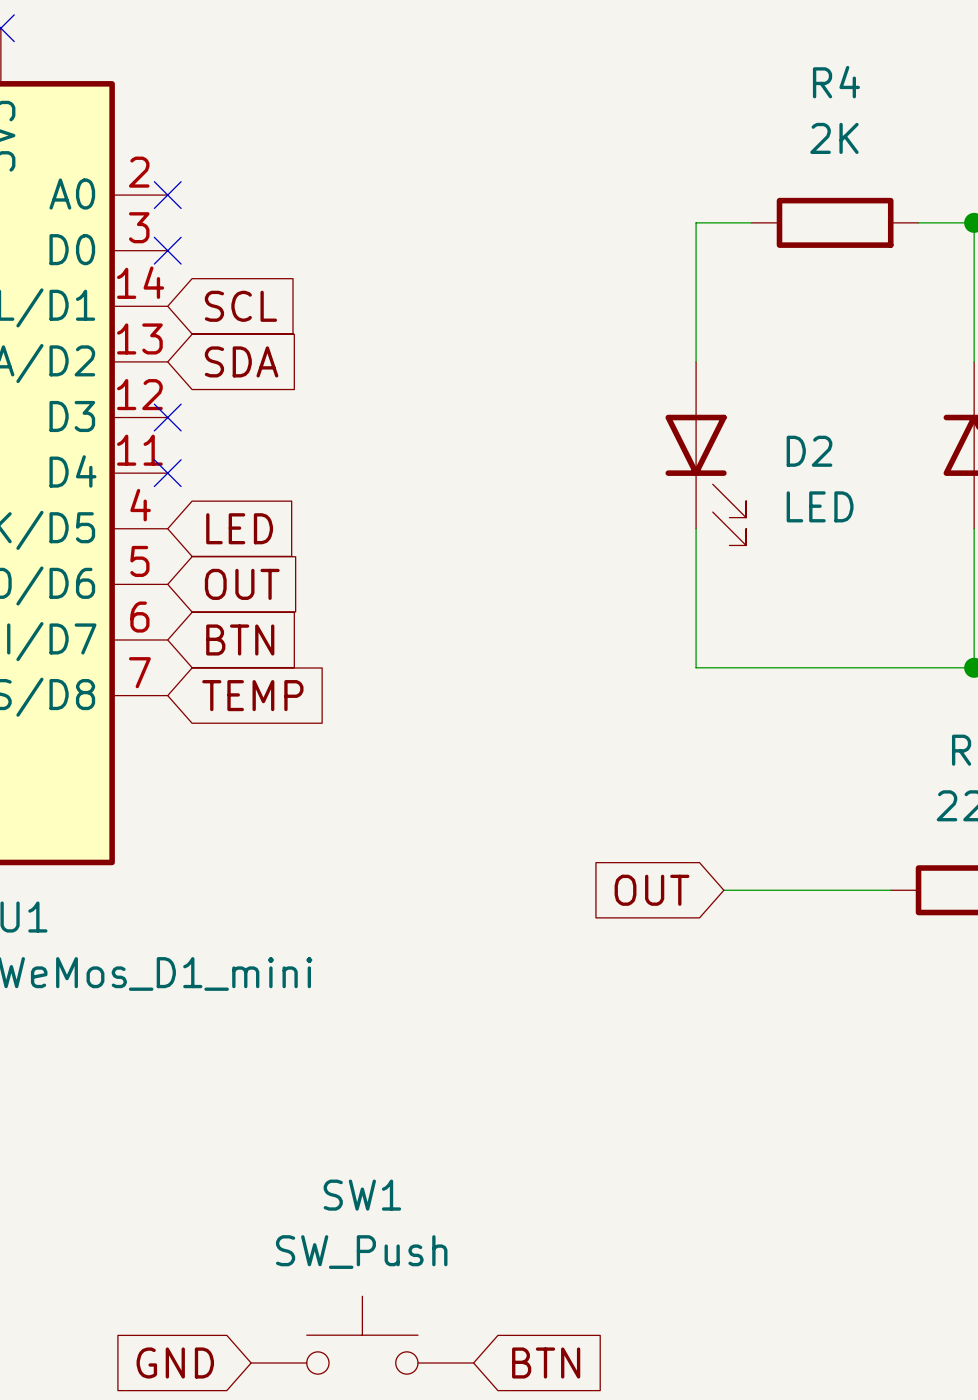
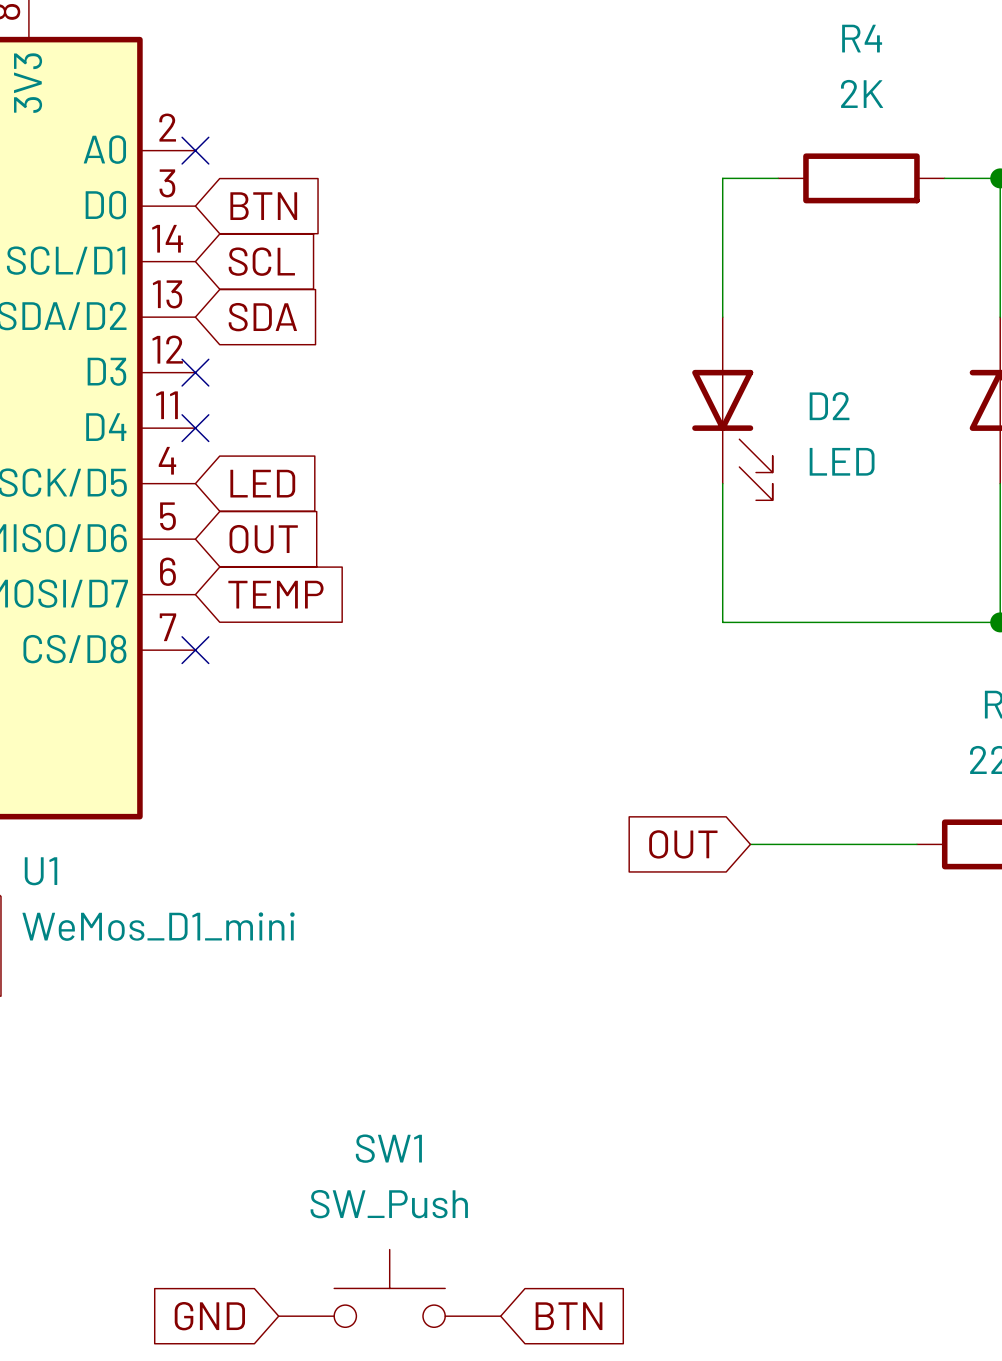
no-connect mark: (167, 250) -> none
global label: none -> BTN (263, 206)
global label: BTN (240, 639) -> TEMP (275, 594)
no-connect mark: none -> (195, 650)
global label: TEMP (252, 695) -> none

